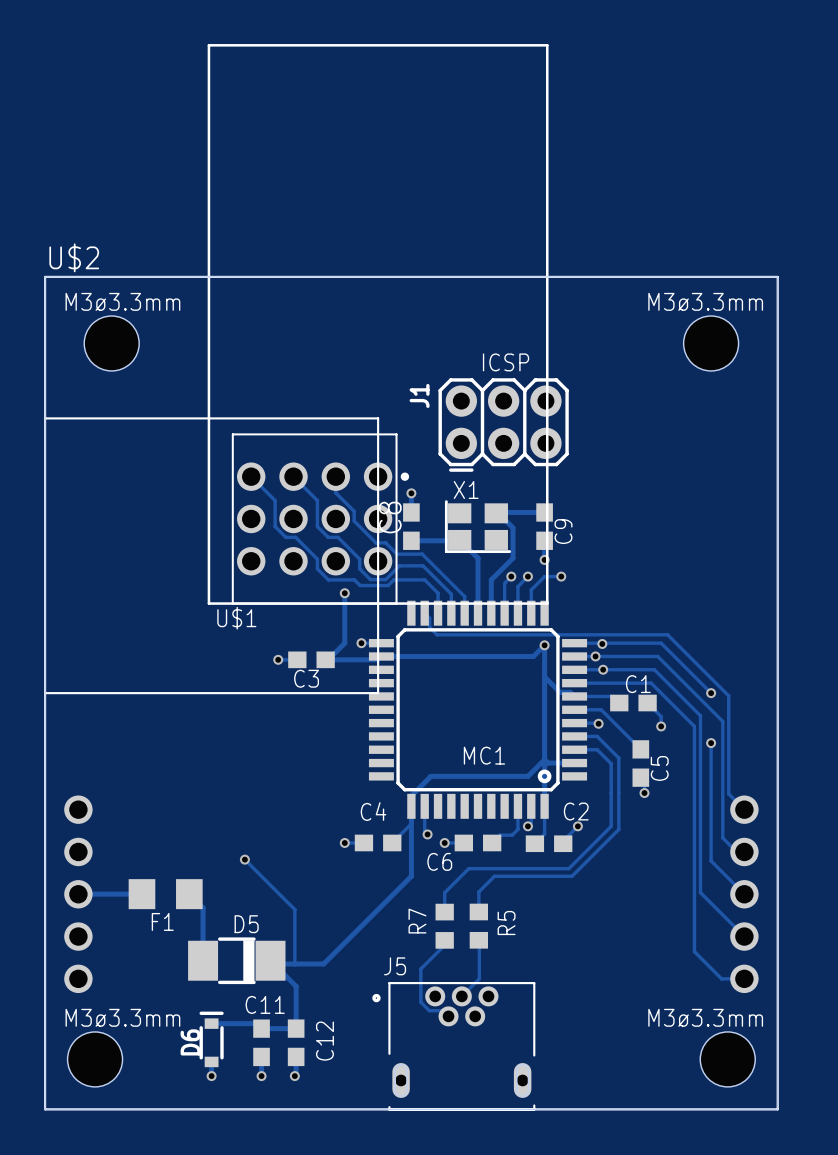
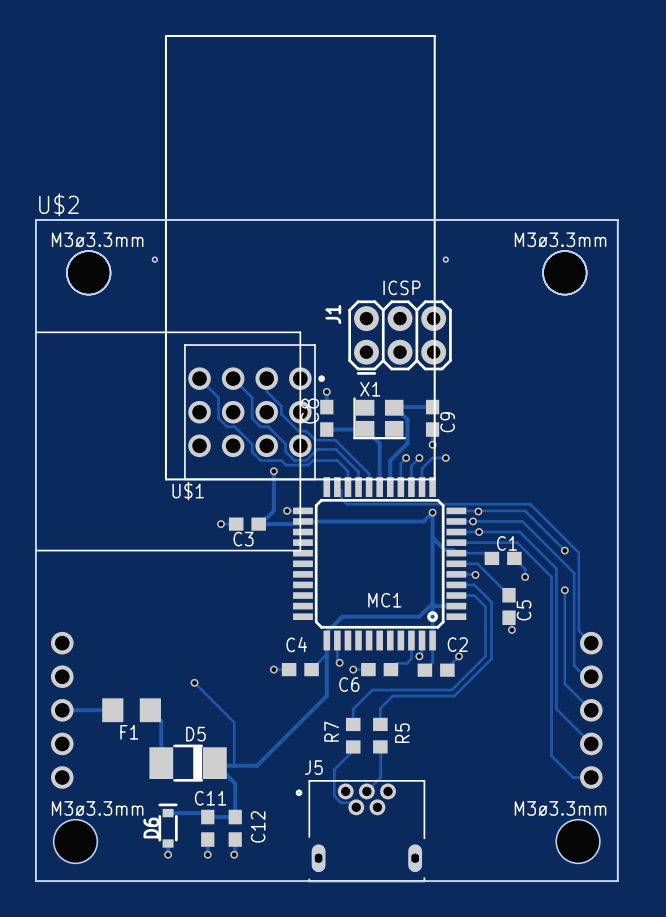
hole: none -> (154, 259)
hole: none -> (445, 259)
hole: none -> (88, 272)
hole: none -> (564, 272)

